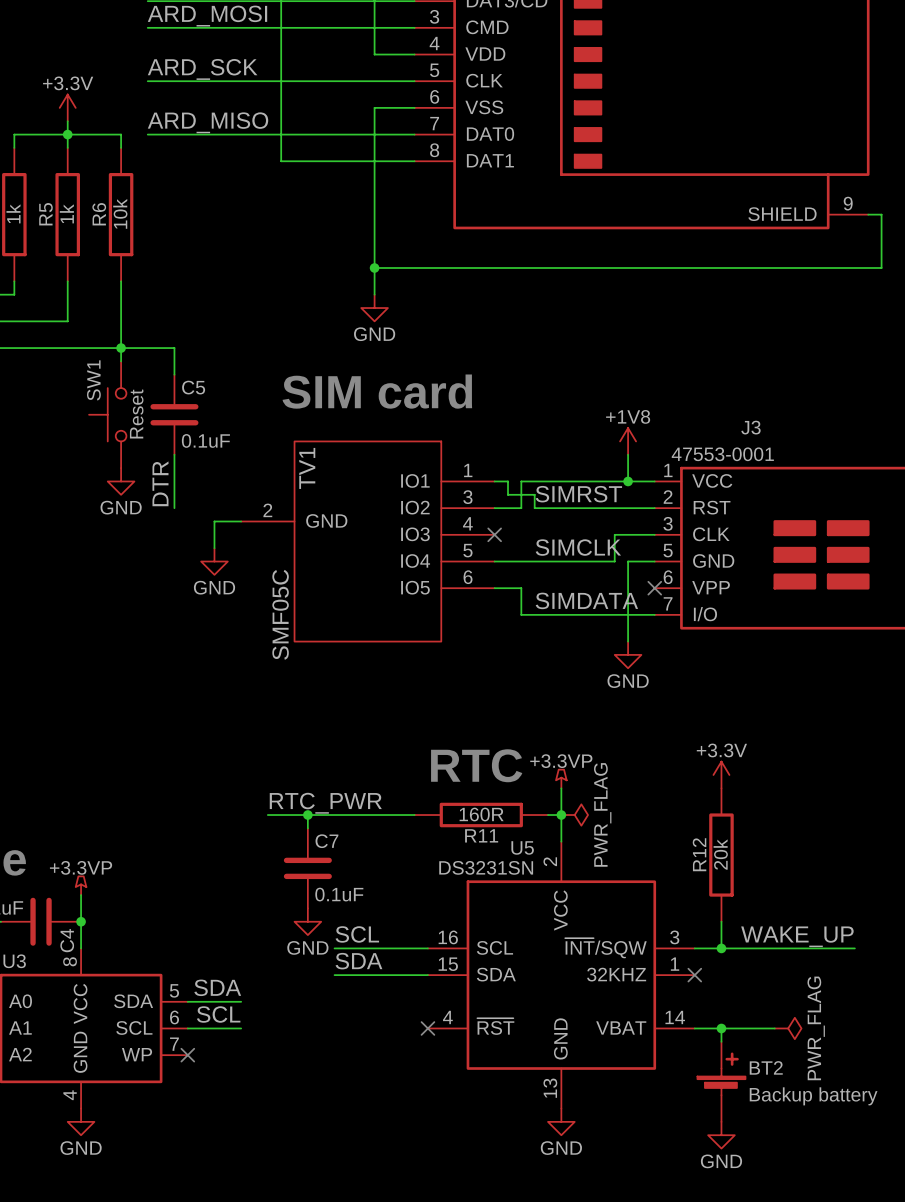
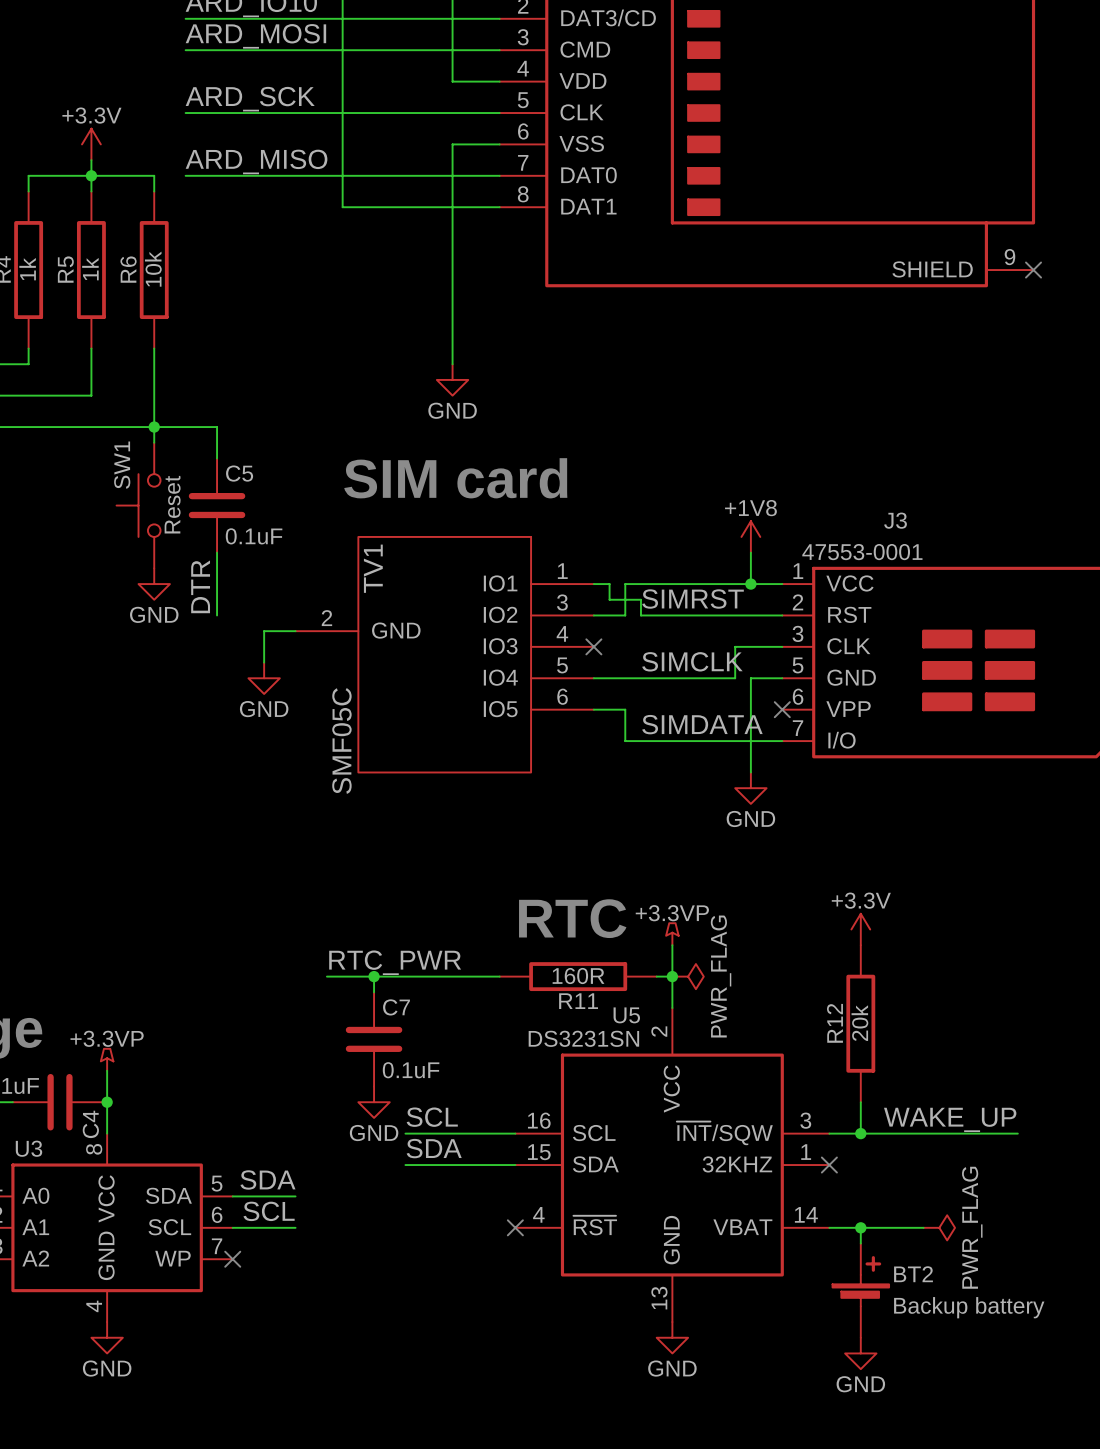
wire: (868, 214) (881, 214) (881, 268) (374, 268) -> none
no-connect mark: none -> (1033, 270)
junction: (374, 268) -> none

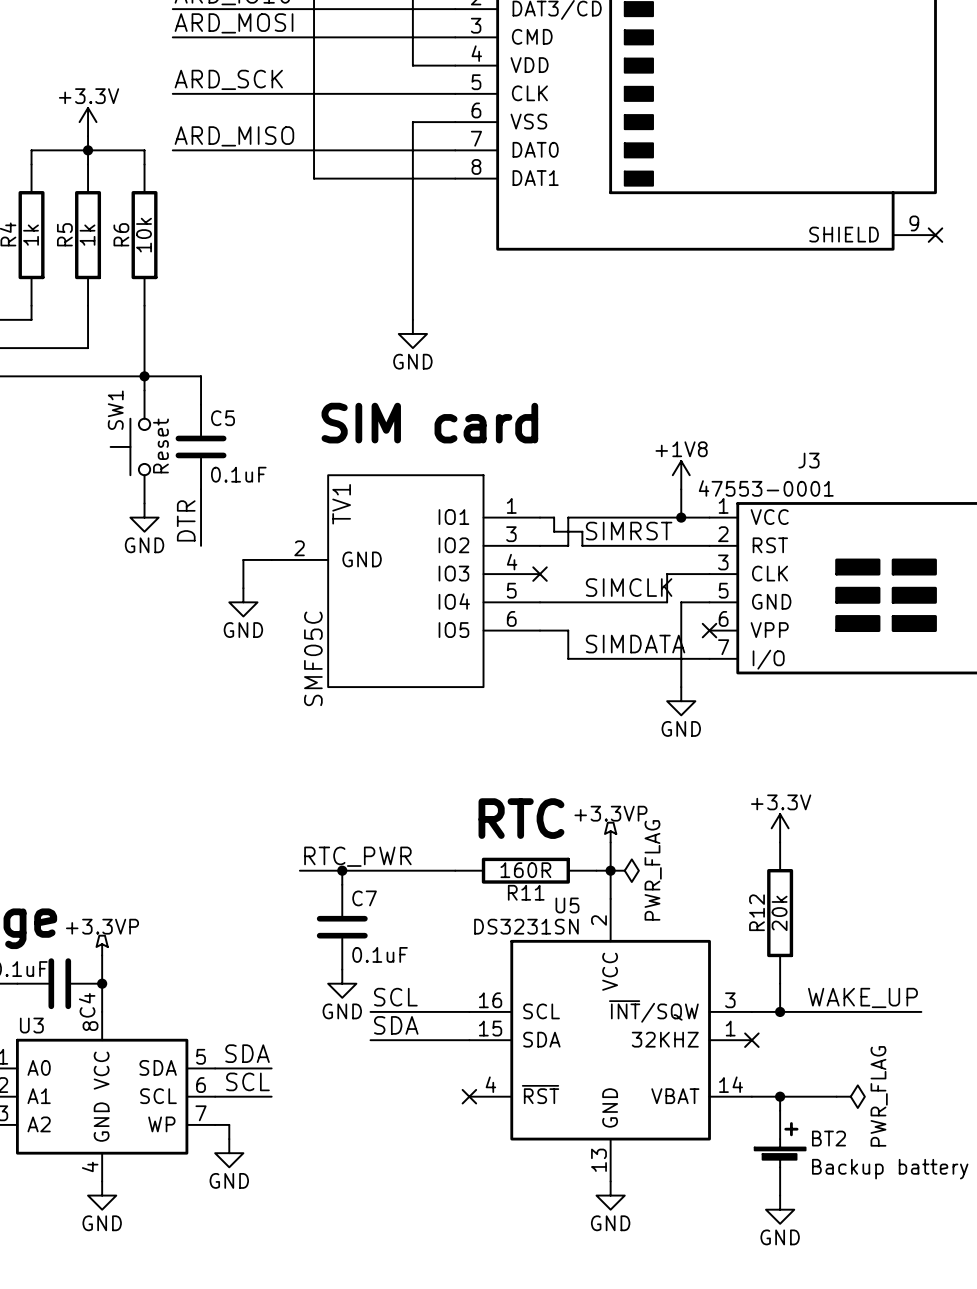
wire: none -> (215, 1124) (229, 1124) (229, 1139)
no-connect mark: (232, 1259) -> none
power symbol: none -> GND (229, 1153)

